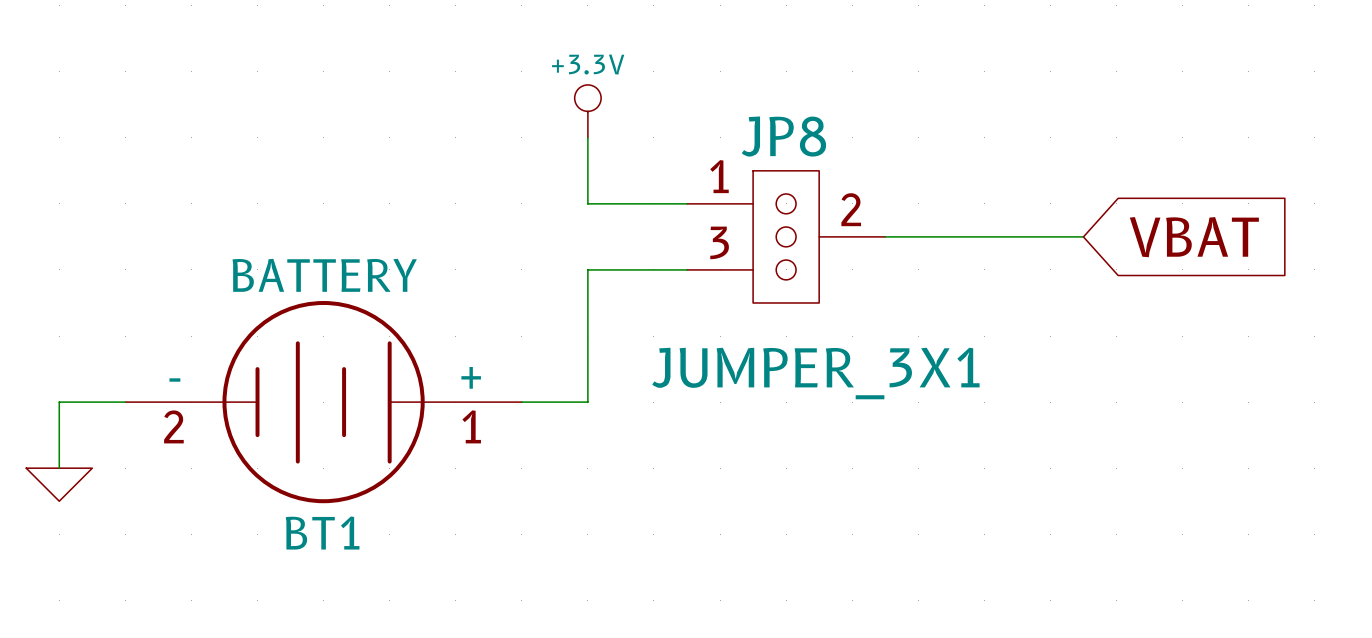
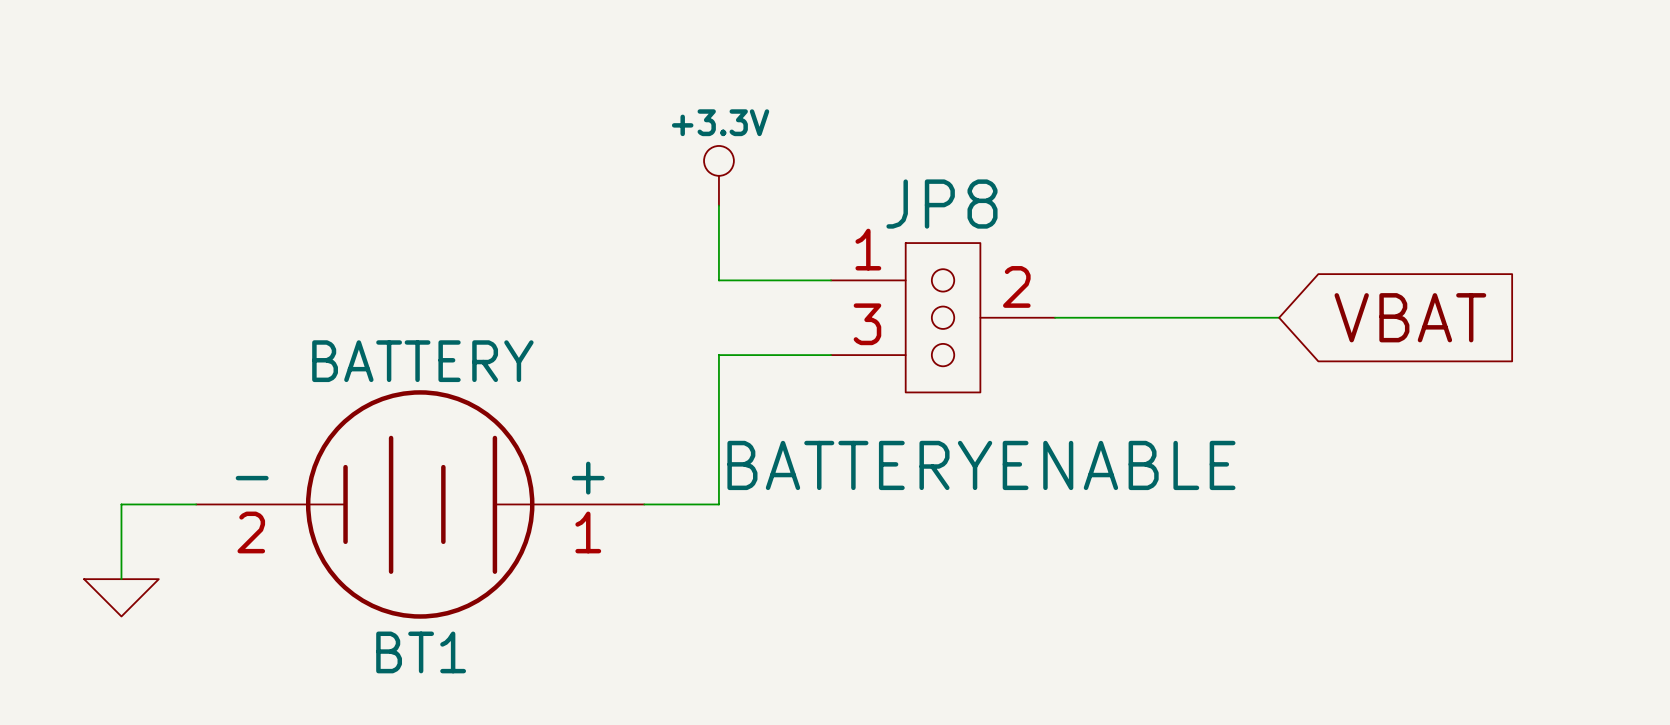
JP8 value: JUMPER_3X1 (815, 373) -> BATTERYENABLE (981, 465)

